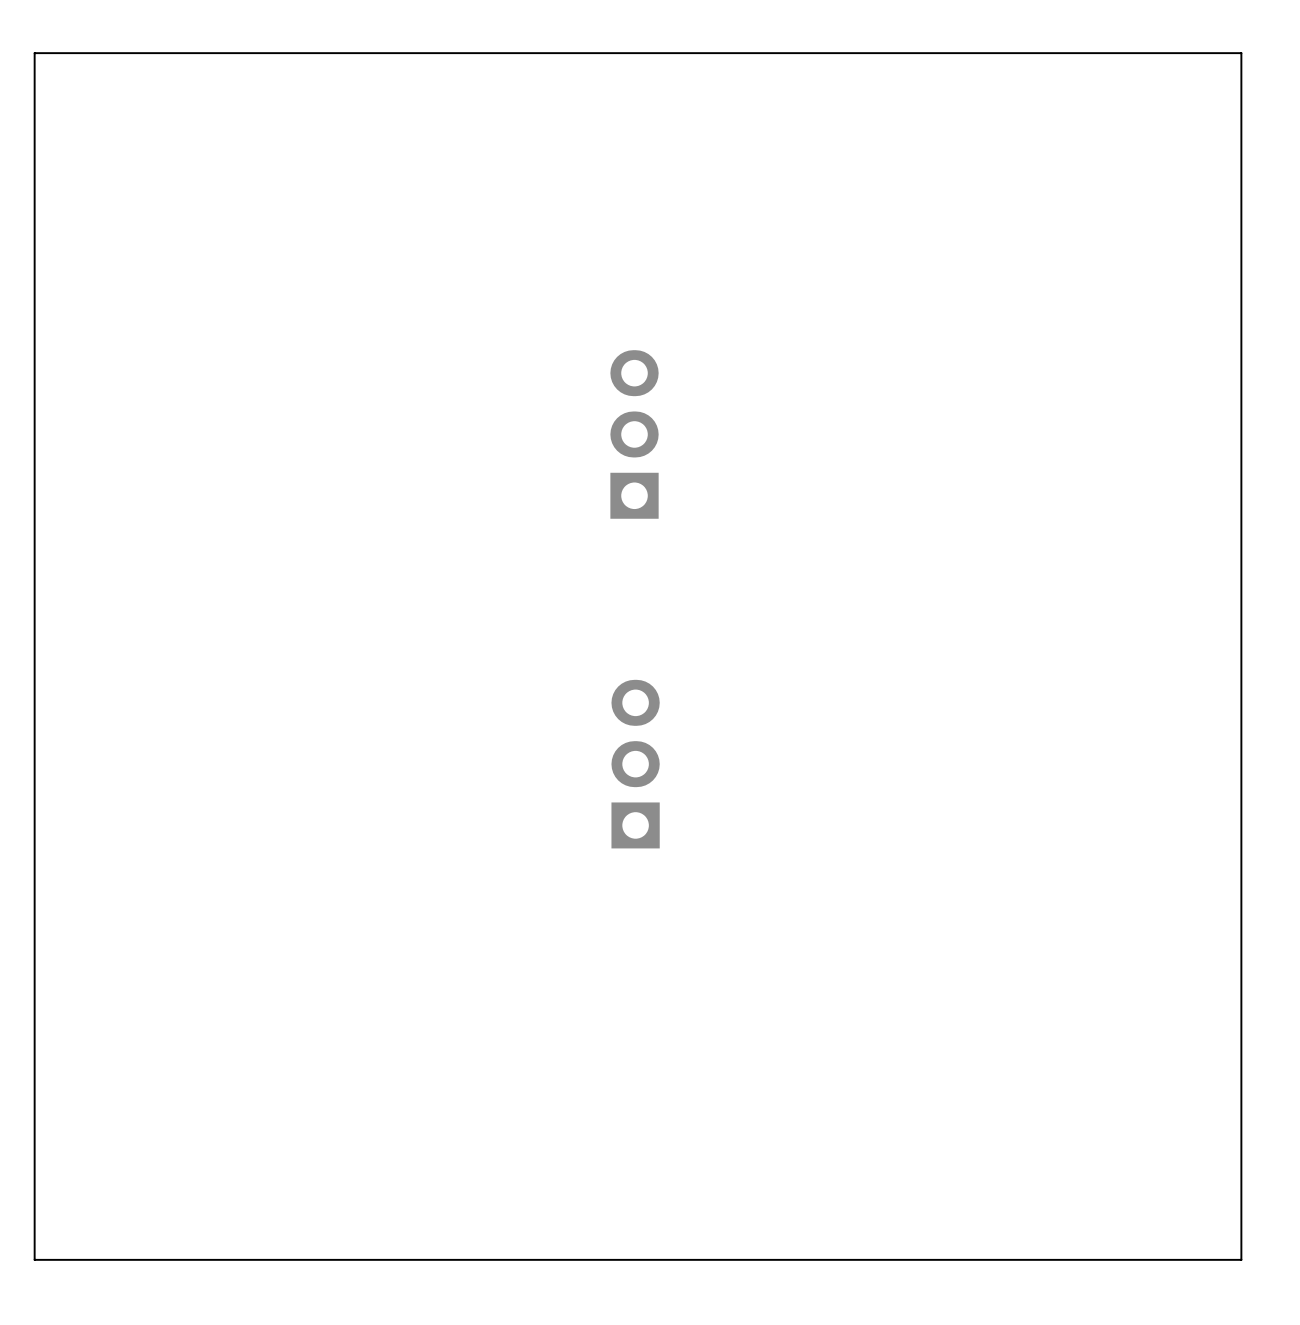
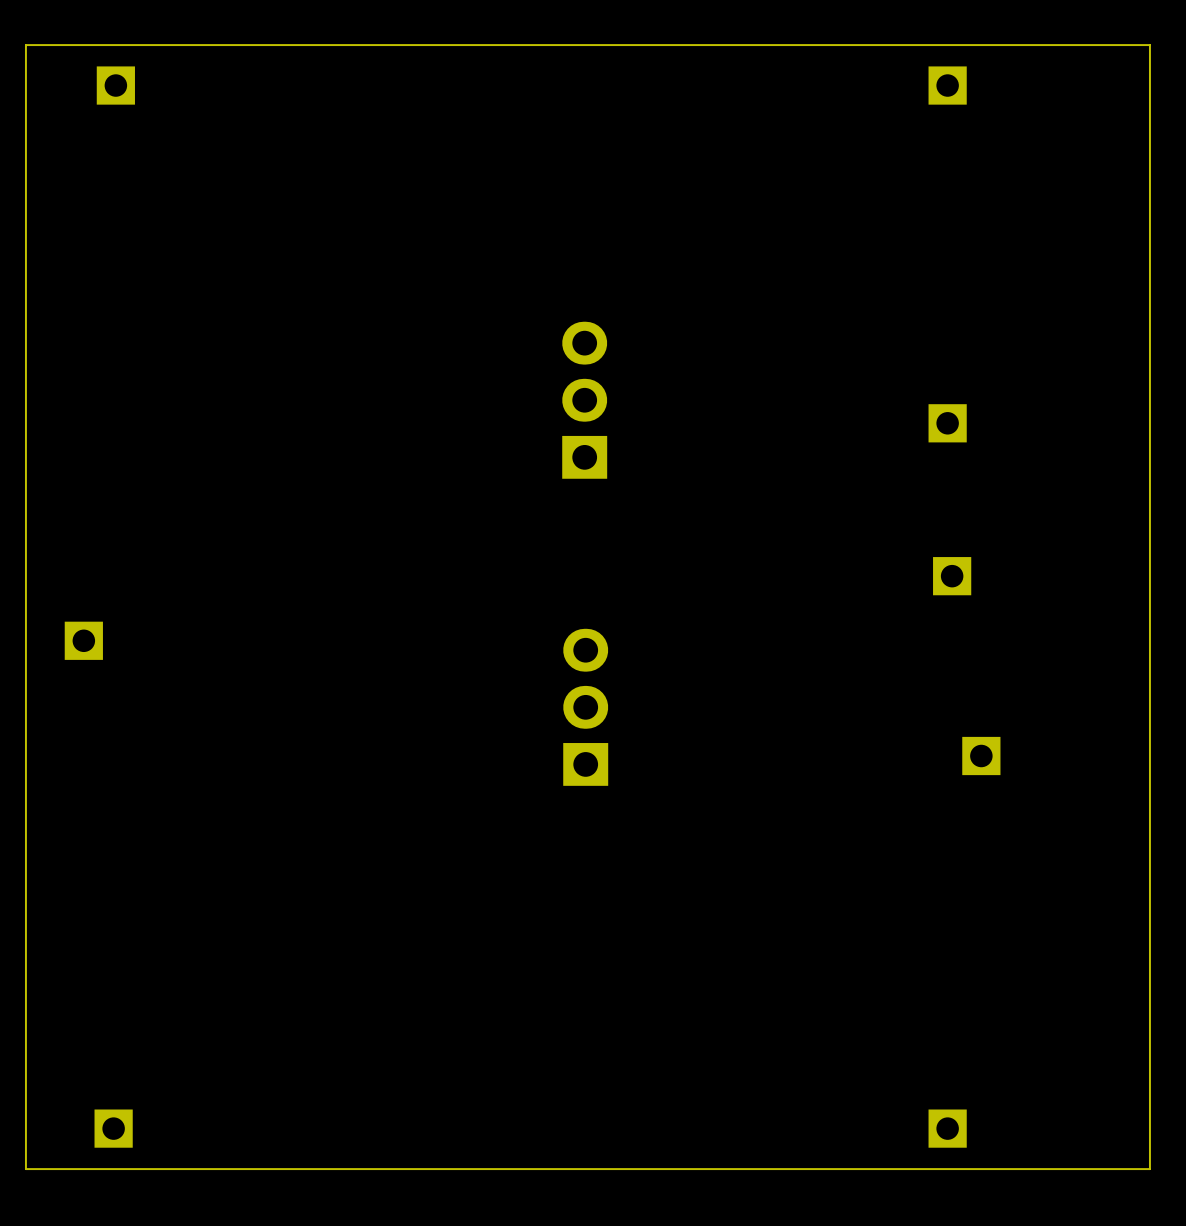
part: none -> (115, 85)
part: none -> (947, 85)
part: none -> (947, 423)
part: none -> (952, 576)
part: none -> (83, 640)
part: none -> (981, 756)
part: none -> (113, 1128)
part: none -> (947, 1128)

